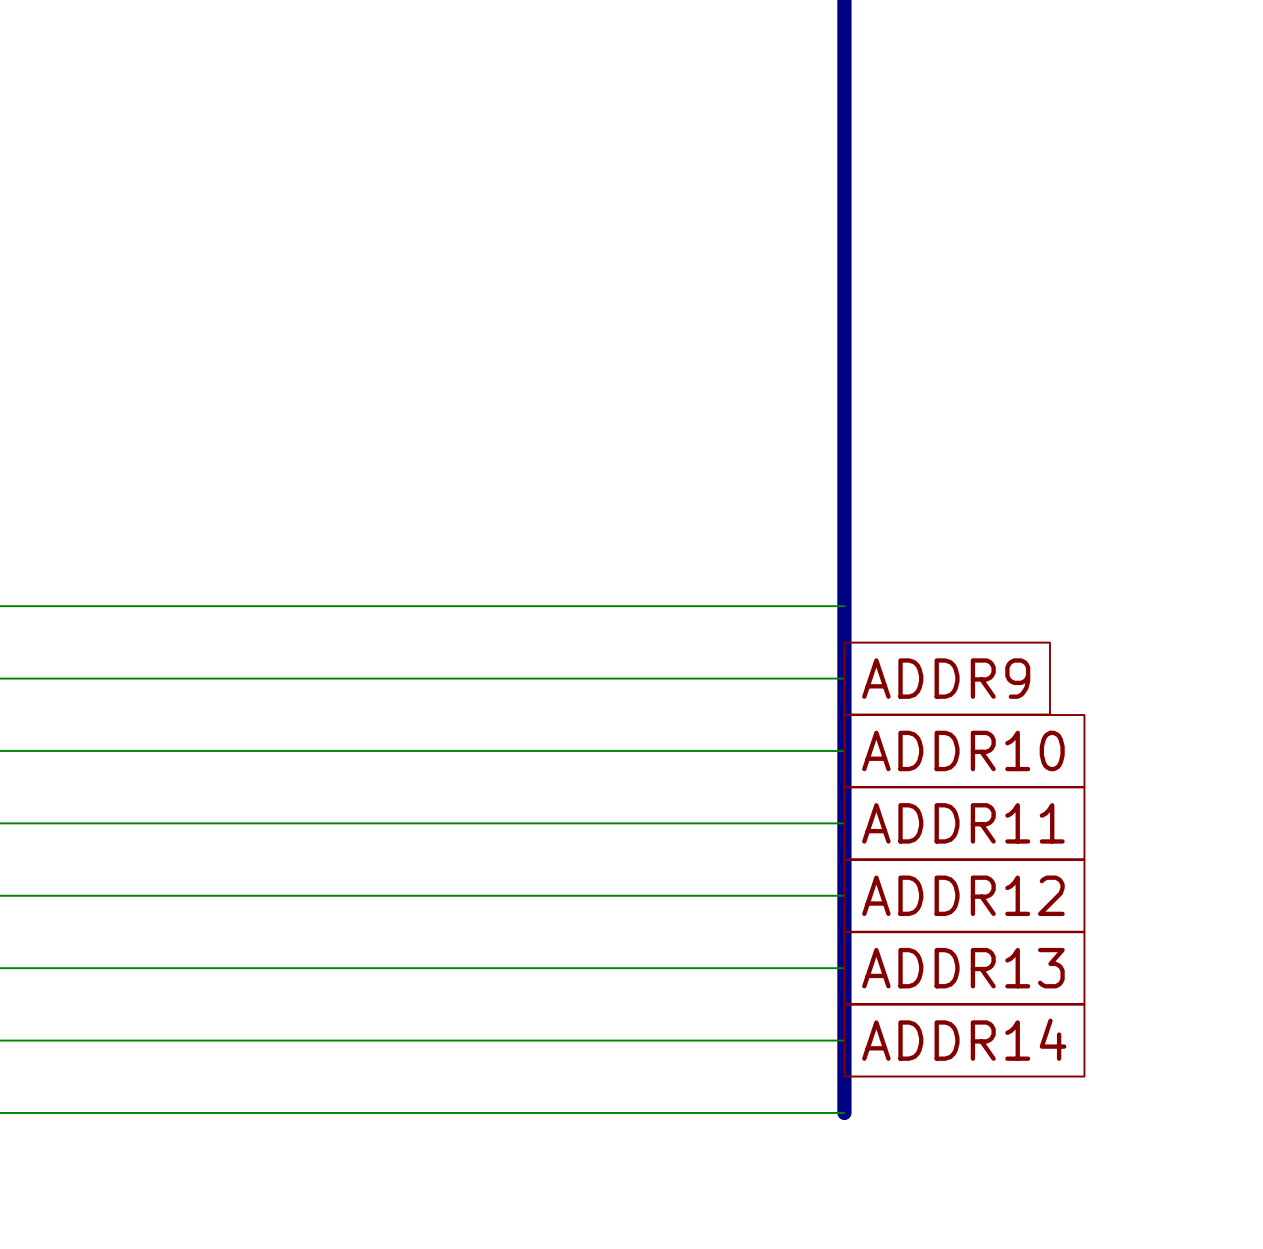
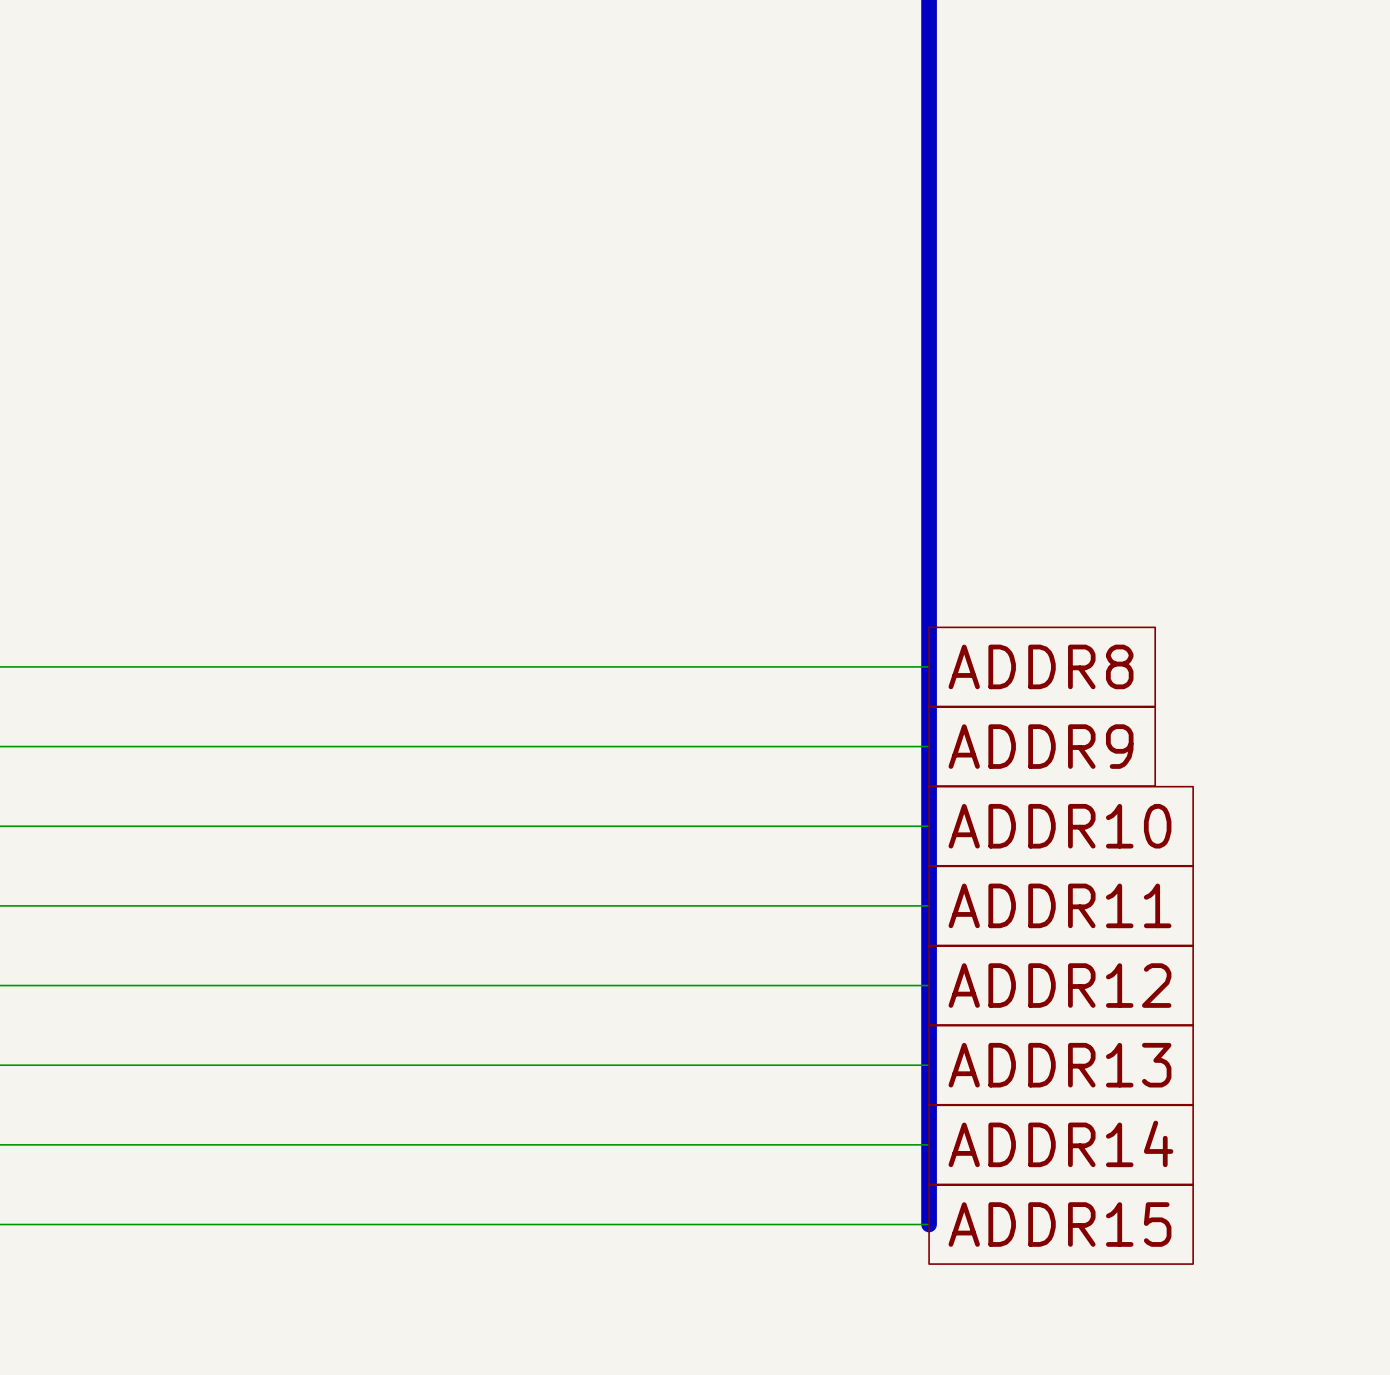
global label: none -> ADDR8 (1041, 666)
global label: none -> ADDR15 (1059, 1224)

